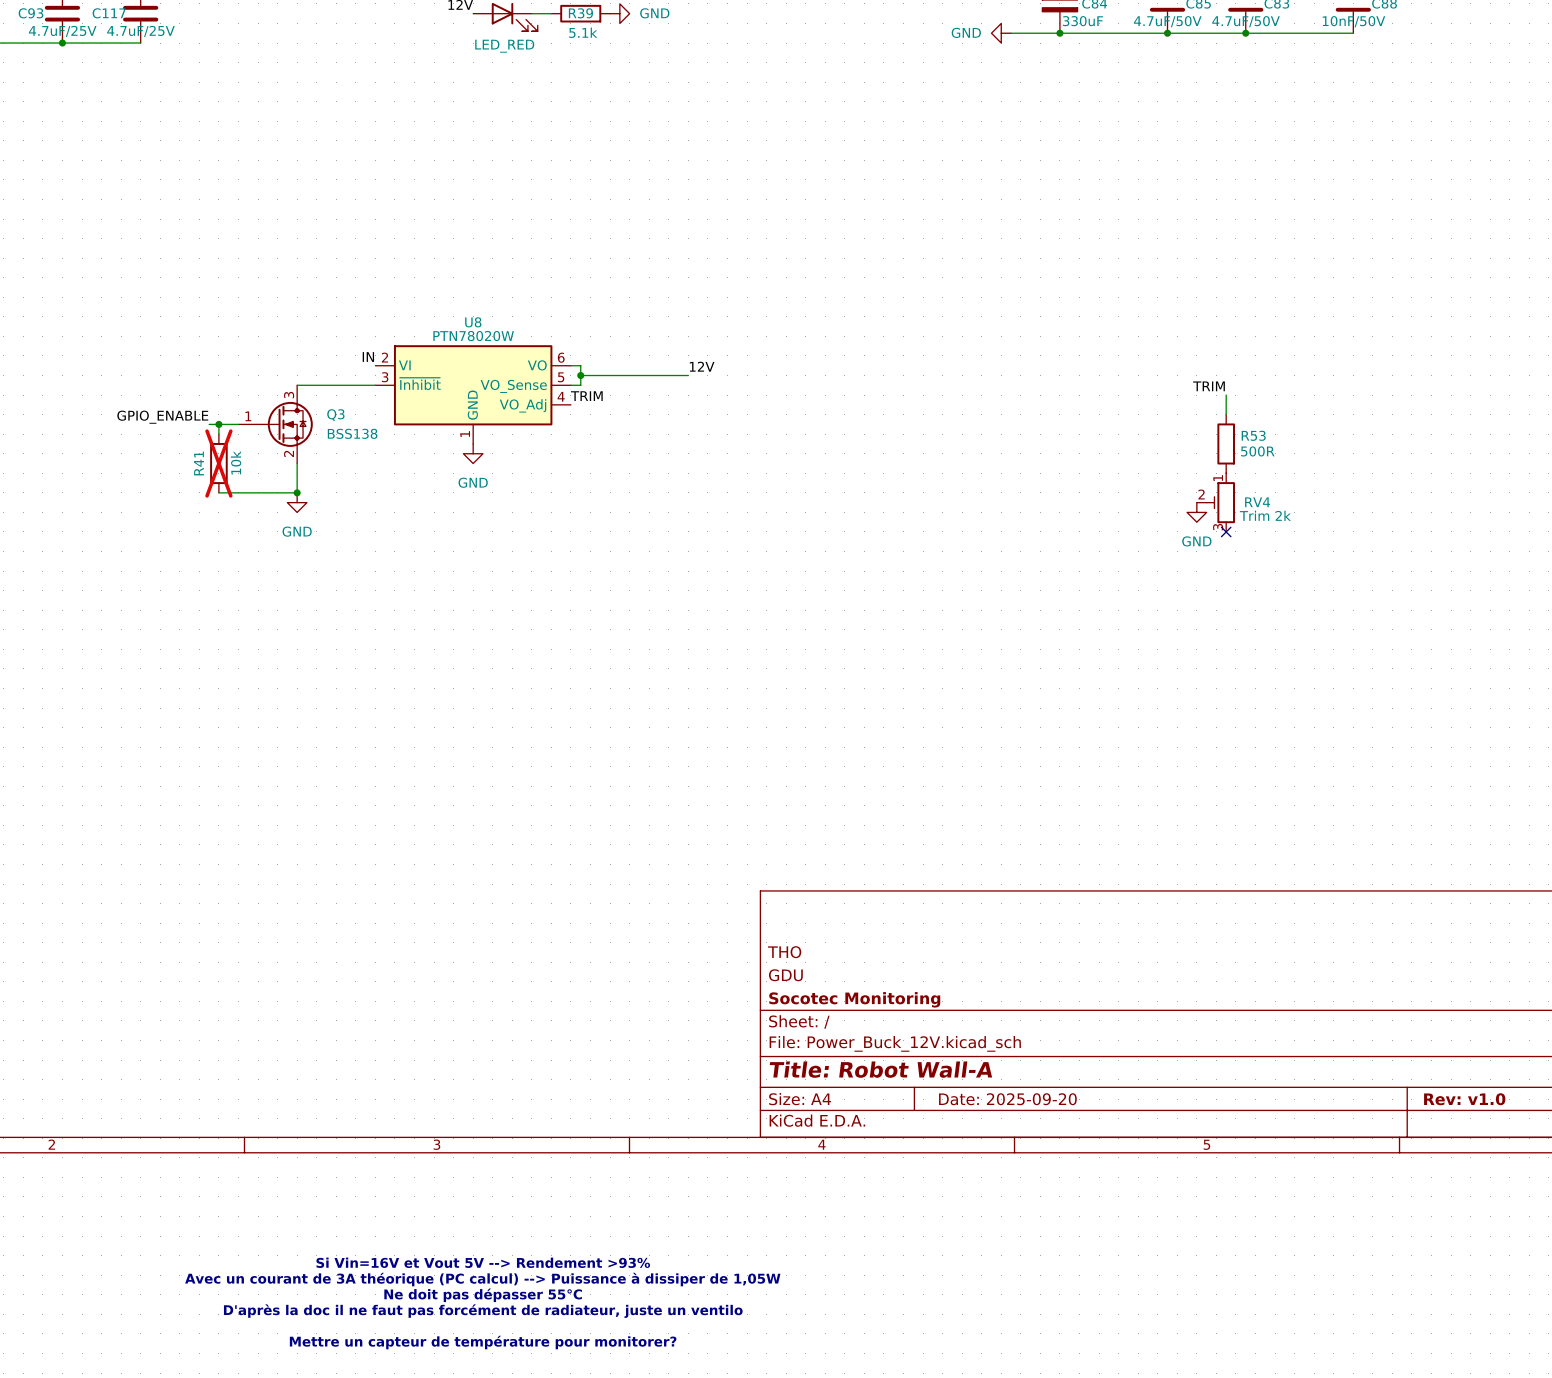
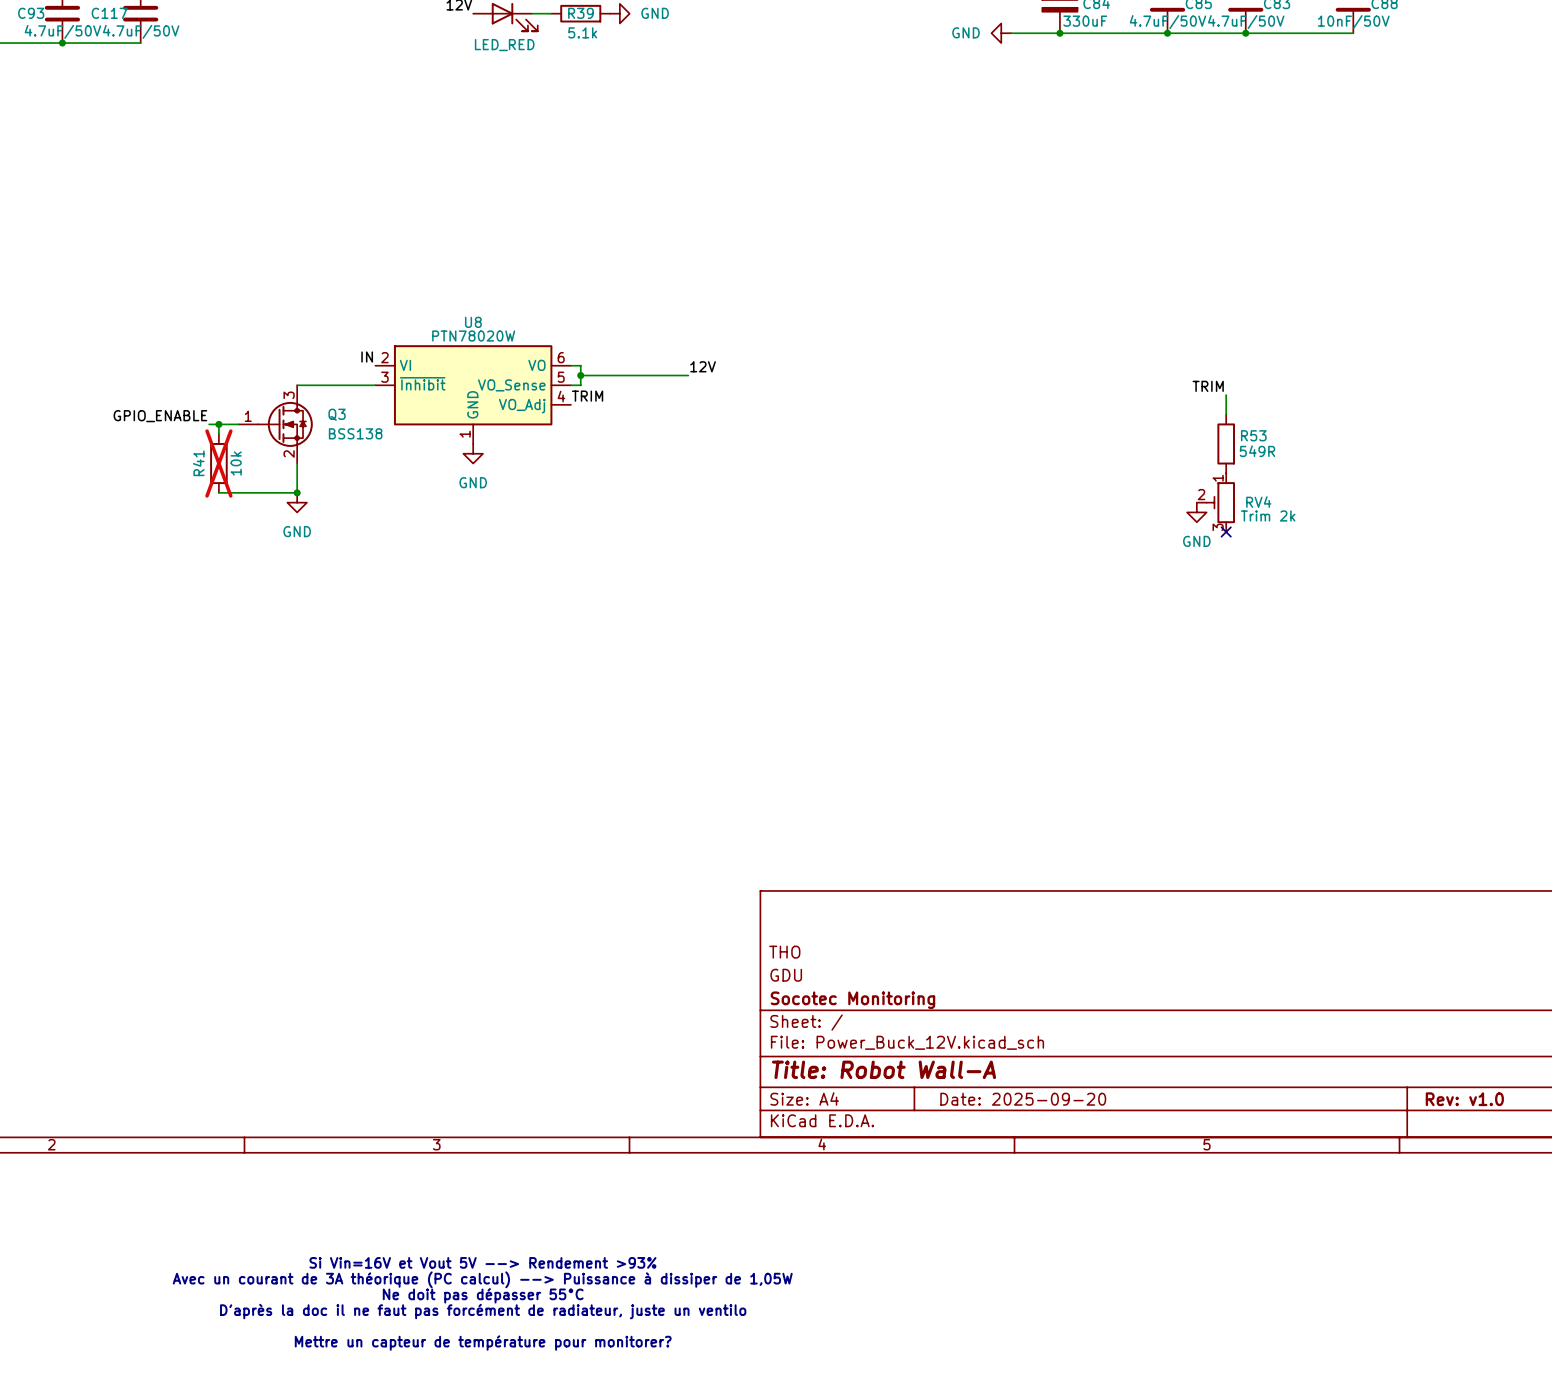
C93 value: 4.7uF/25V (62, 31) -> 4.7uF/50V (62, 31)
C117 value: 4.7uF/25V (140, 31) -> 4.7uF/50V (141, 31)
R53 value: 500R (1257, 451) -> 549R (1257, 451)

